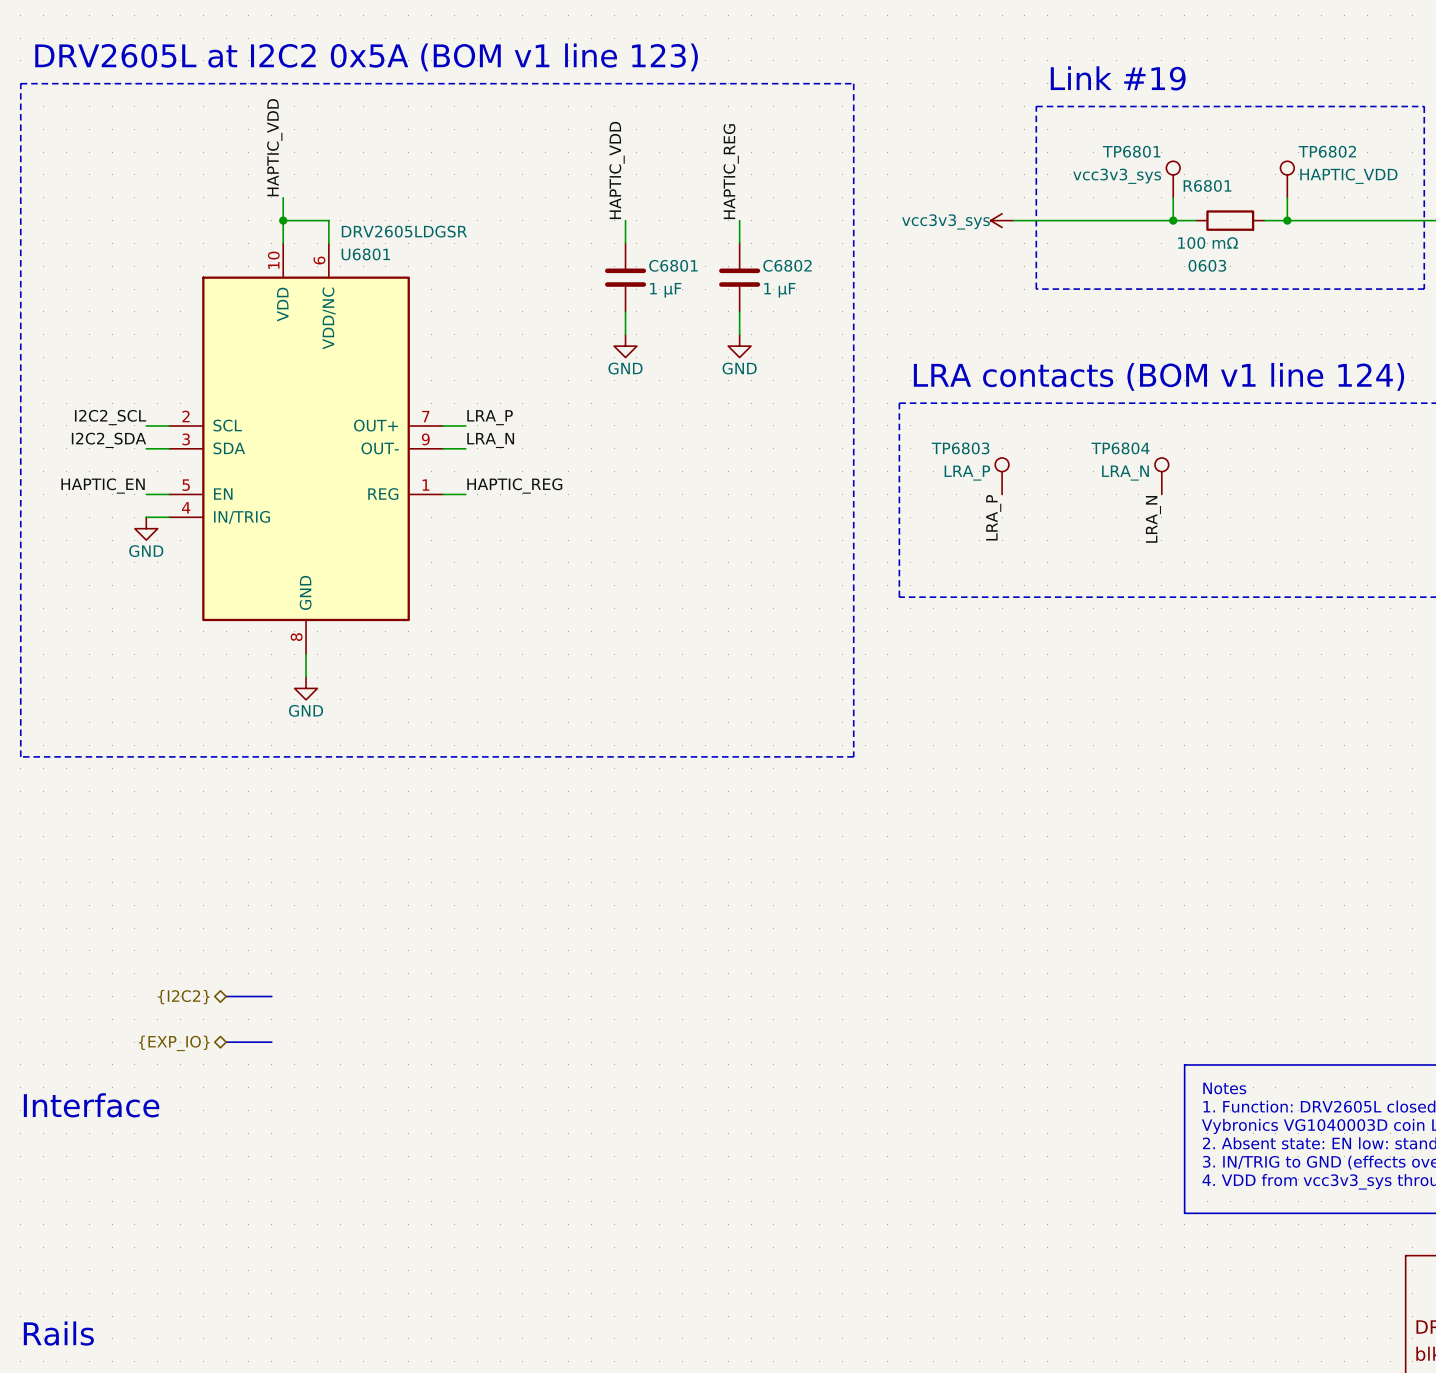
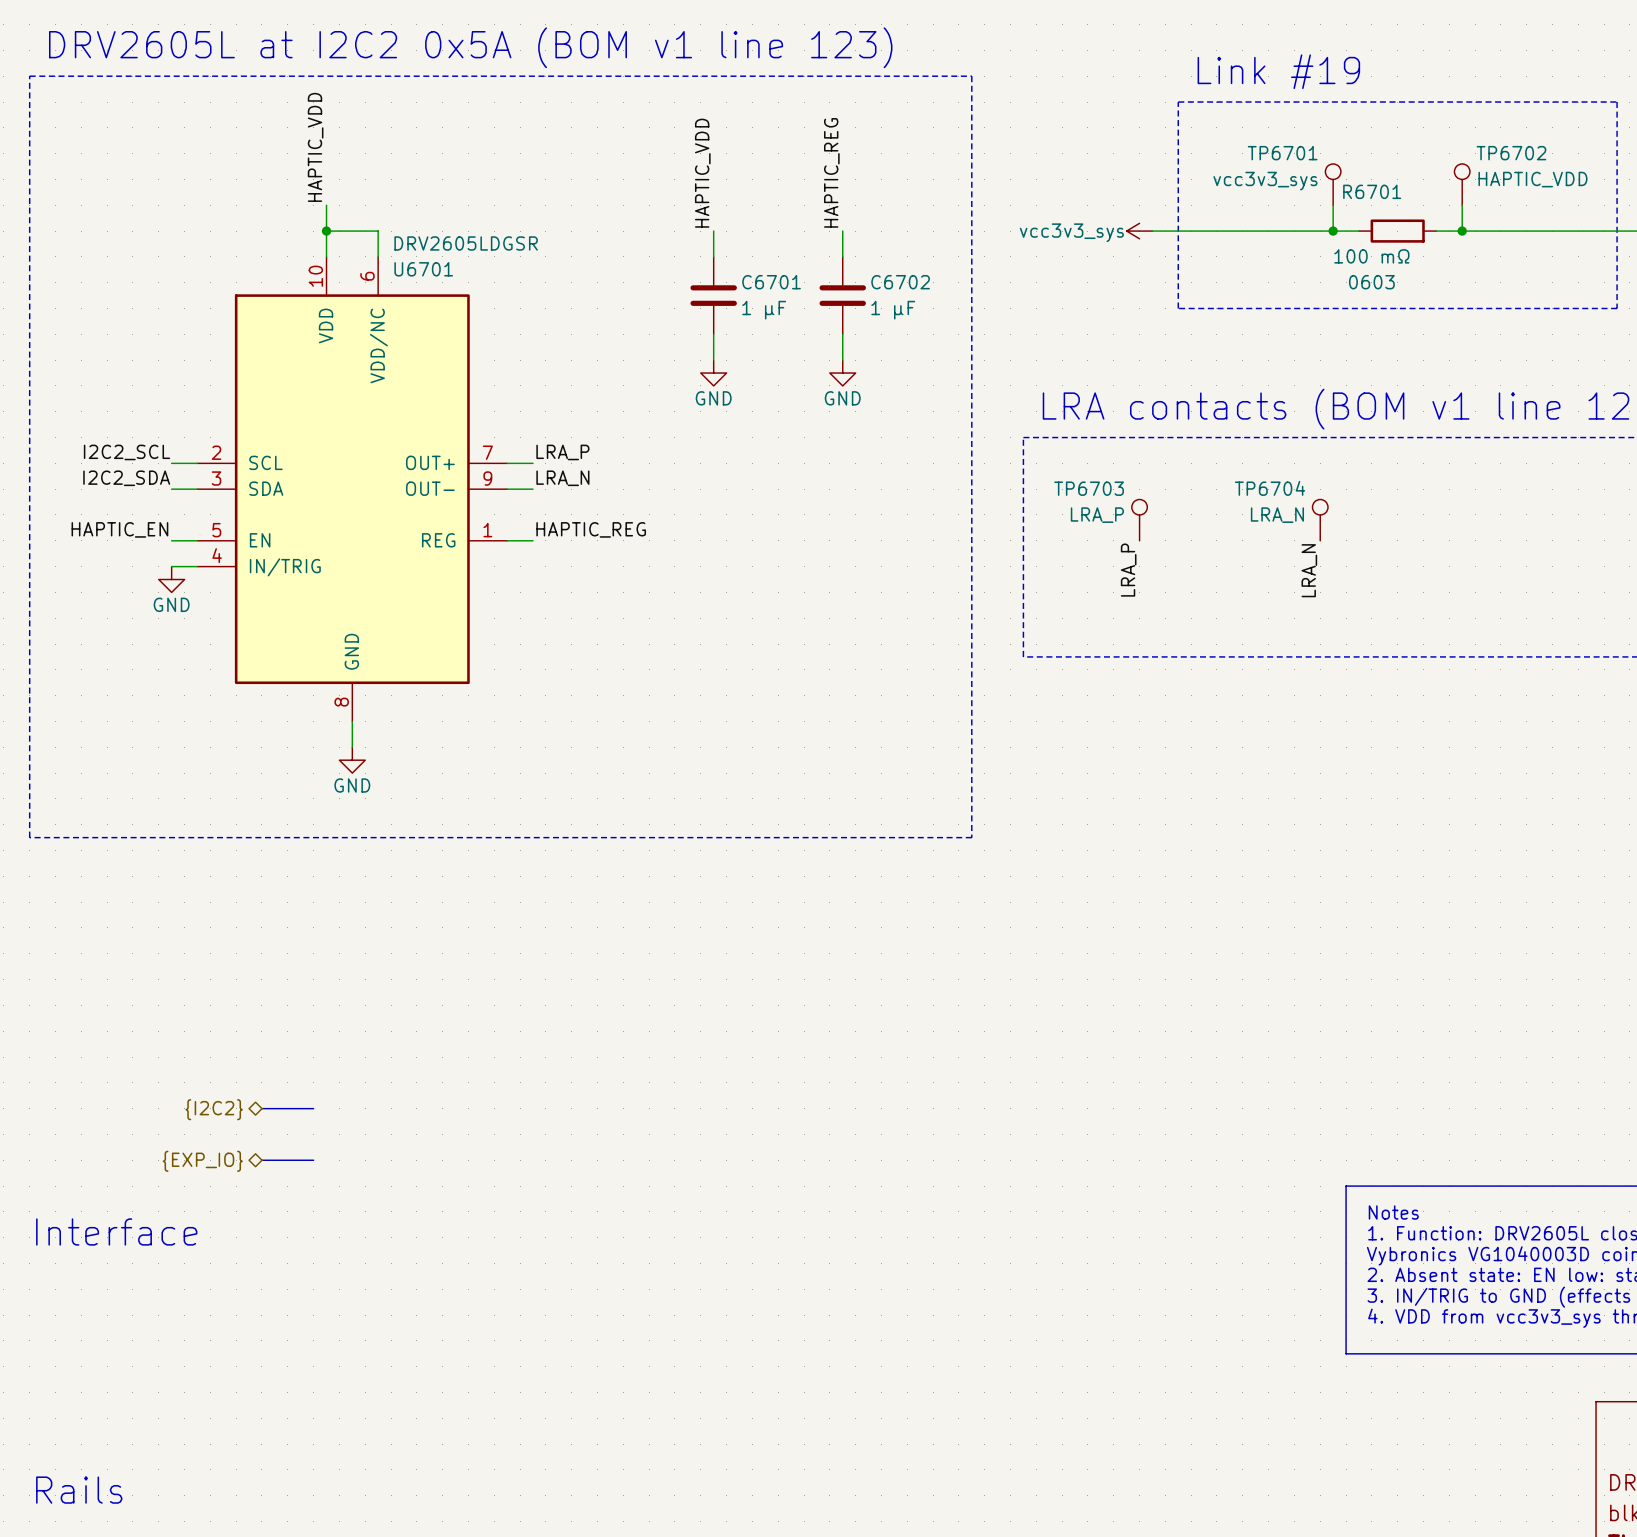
TP6801 name: TP6801 (1131, 151) -> TP6701 (1282, 153)
TP6802 name: TP6802 (1327, 151) -> TP6702 (1511, 153)
R6801 name: R6801 (1207, 185) -> R6701 (1372, 191)
U6801 name: U6801 (365, 254) -> U6701 (423, 269)
C6801 name: C6801 (673, 265) -> C6701 (771, 282)
C6802 name: C6802 (787, 265) -> C6702 (900, 282)
TP6803 name: TP6803 (960, 448) -> TP6703 (1089, 488)
TP6804 name: TP6804 (1120, 448) -> TP6704 (1270, 488)

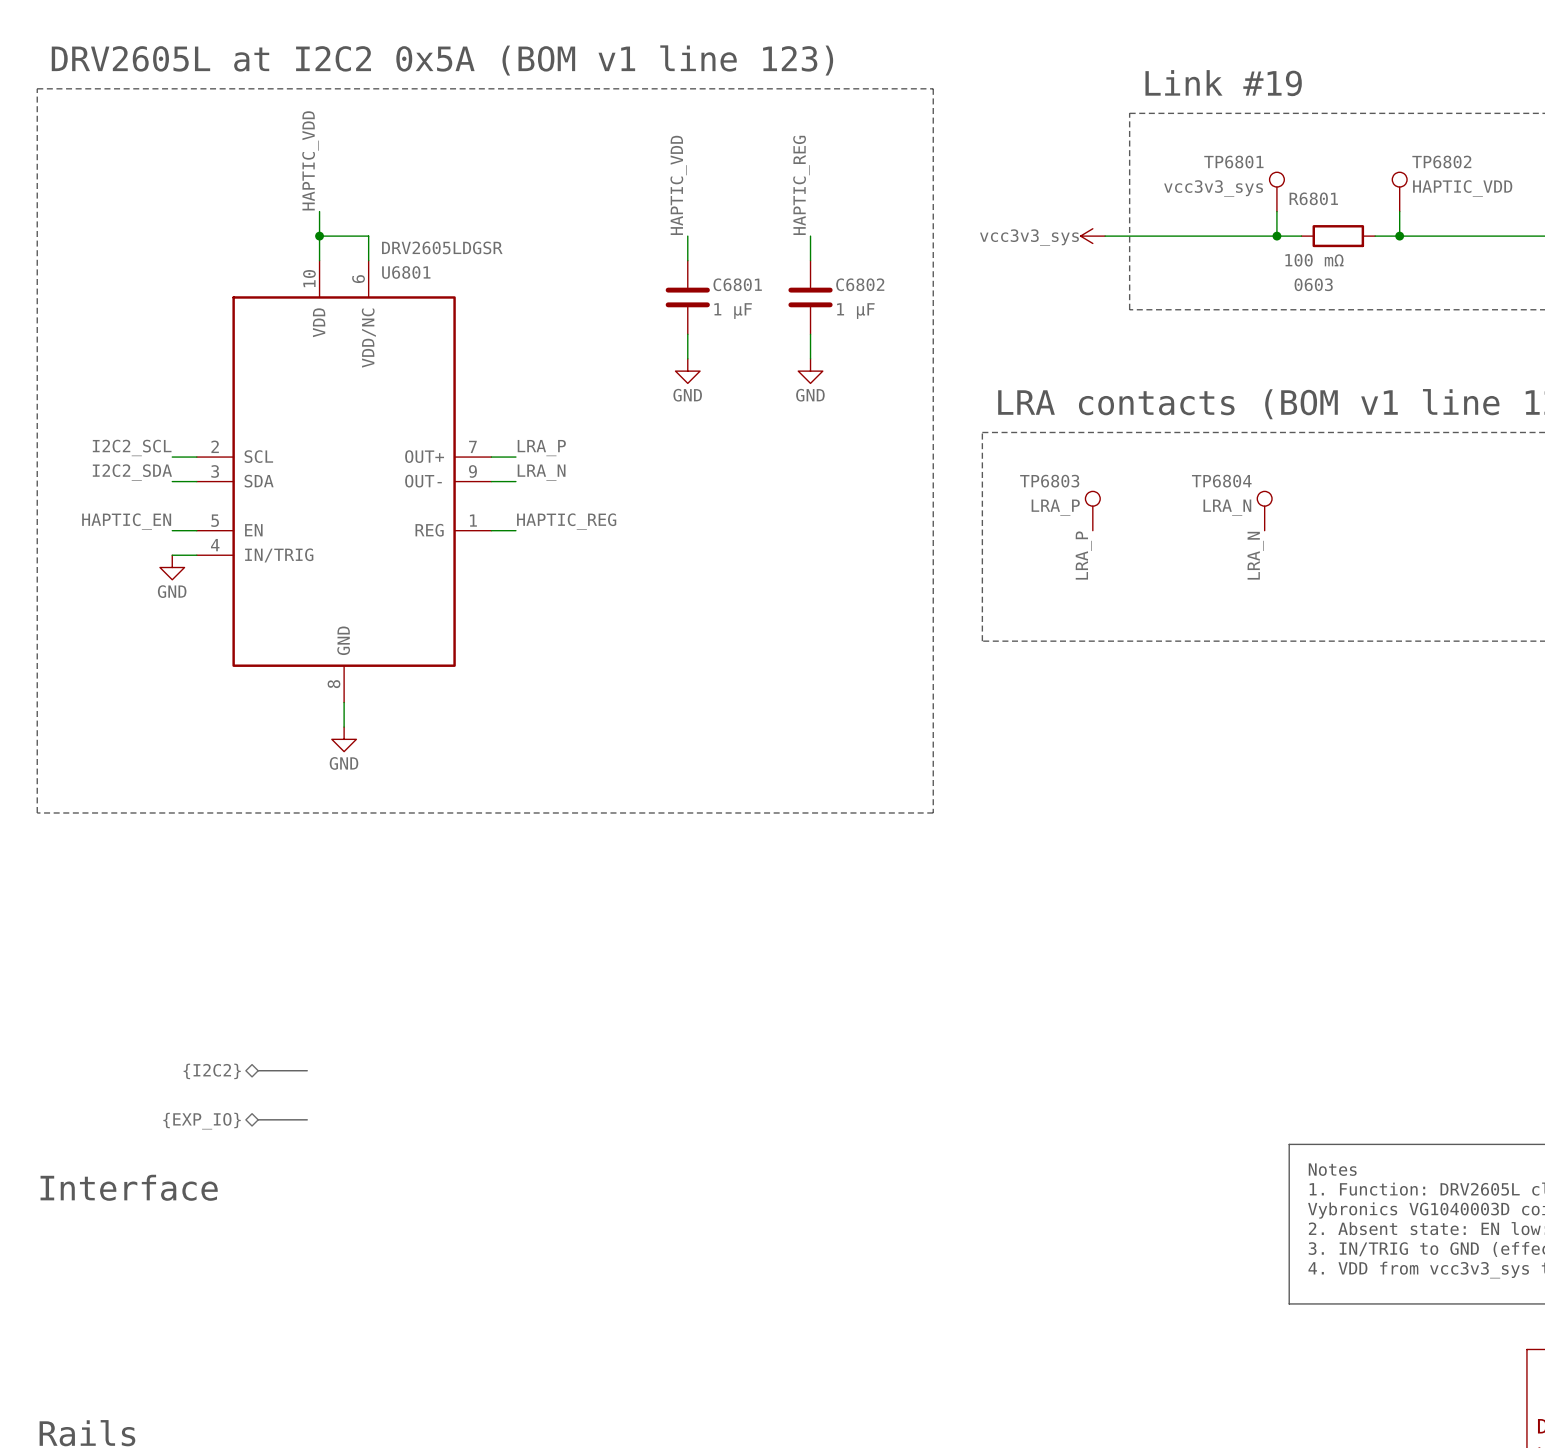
TP6701 name: TP6701 (1282, 153) -> TP6801 (1233, 162)
TP6702 name: TP6702 (1511, 153) -> TP6802 (1441, 162)
R6701 name: R6701 (1372, 191) -> R6801 (1313, 198)
U6701 name: U6701 (423, 269) -> U6801 (406, 272)
C6701 name: C6701 (771, 282) -> C6801 (737, 284)
C6702 name: C6702 (900, 282) -> C6802 (860, 284)
TP6703 name: TP6703 (1089, 488) -> TP6803 (1049, 481)
TP6704 name: TP6704 (1270, 488) -> TP6804 (1221, 481)

